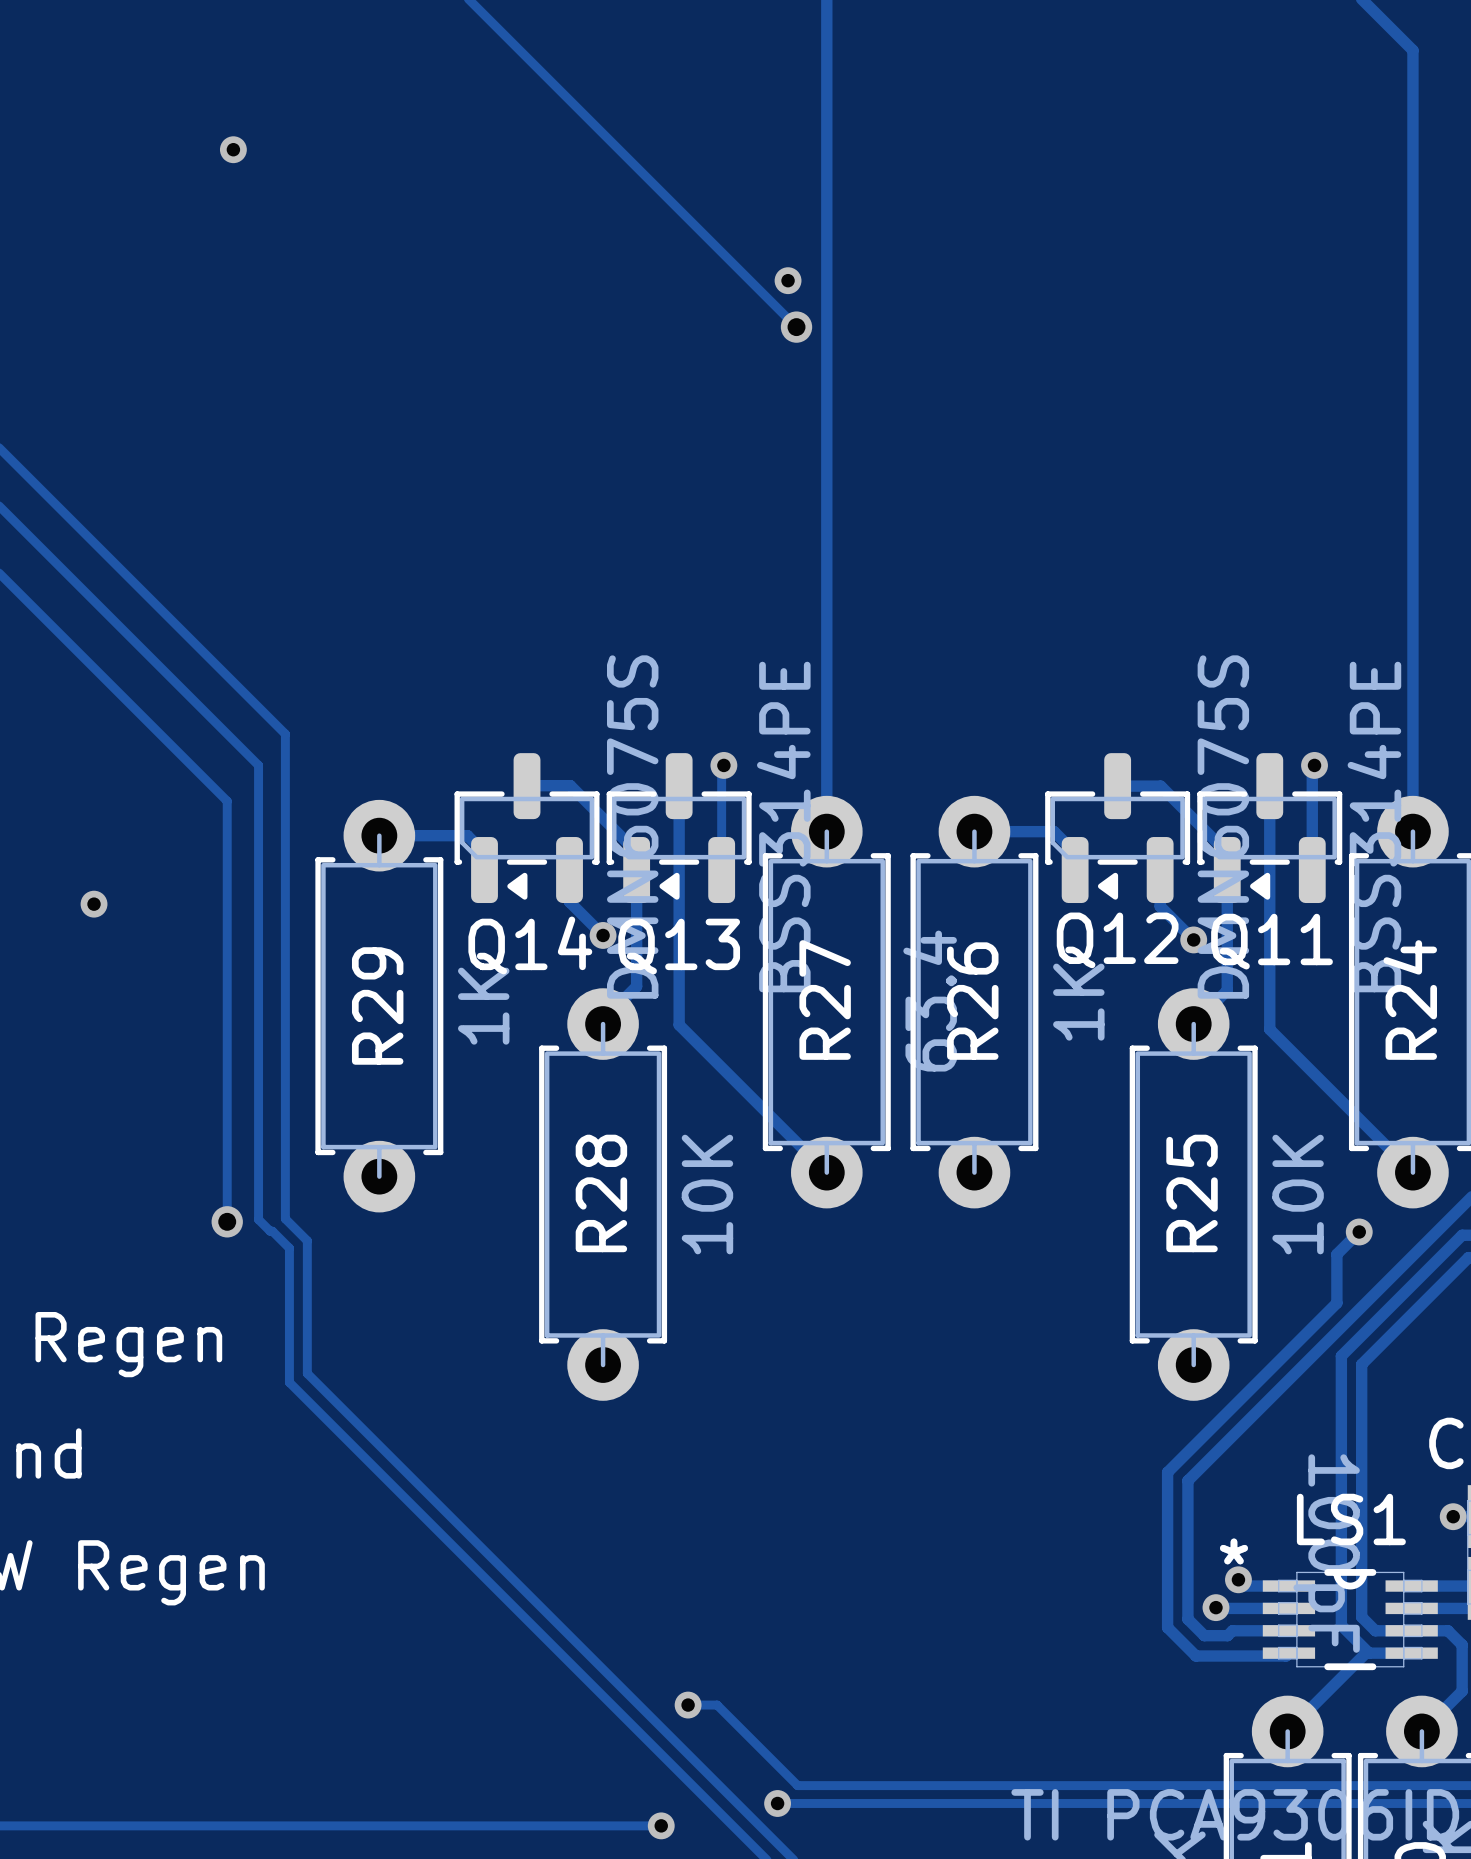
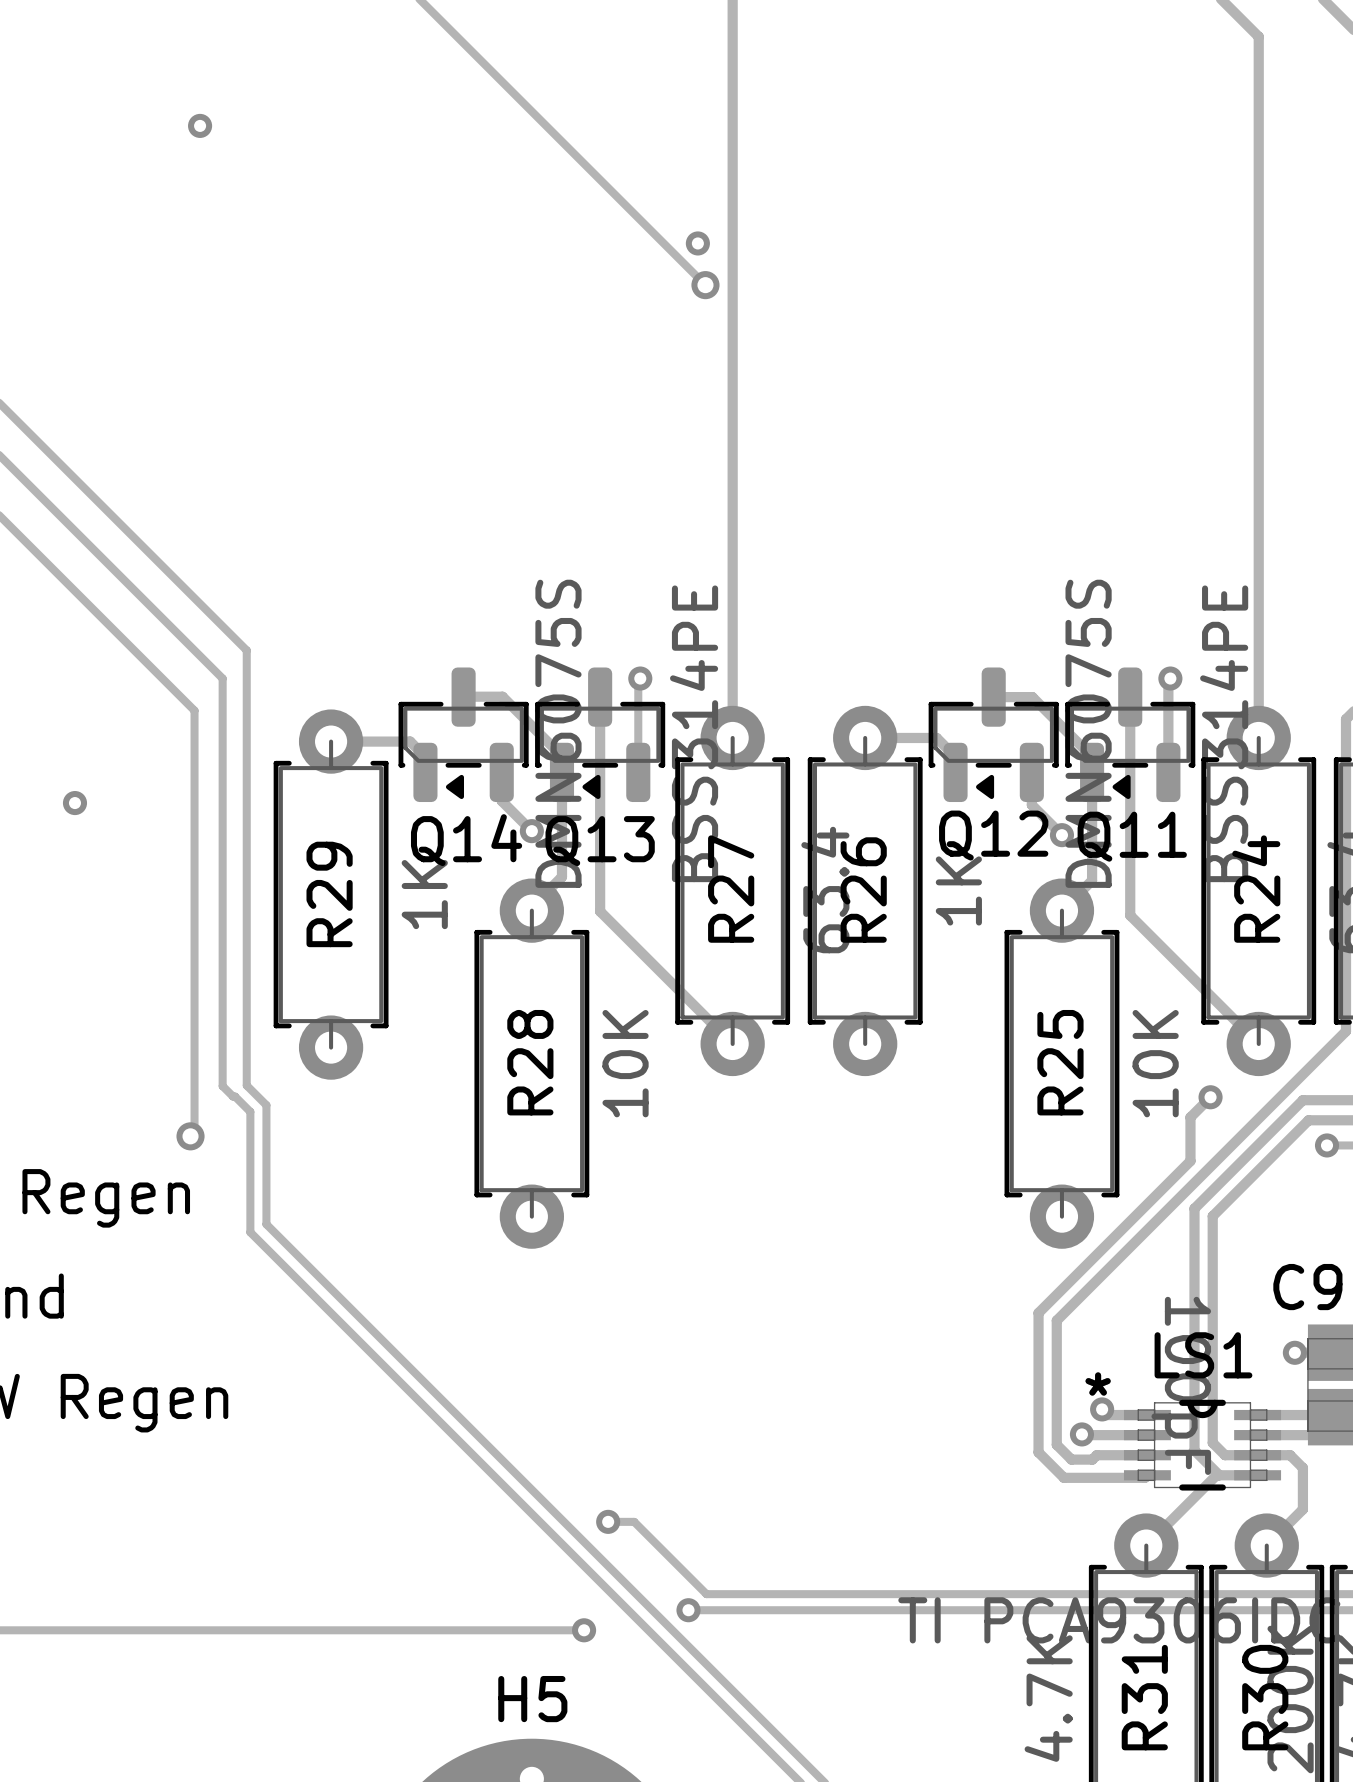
track: none -> (194, 1088) (194, 1132) (190, 1136)
via position: (227, 1221) -> (190, 1136)

